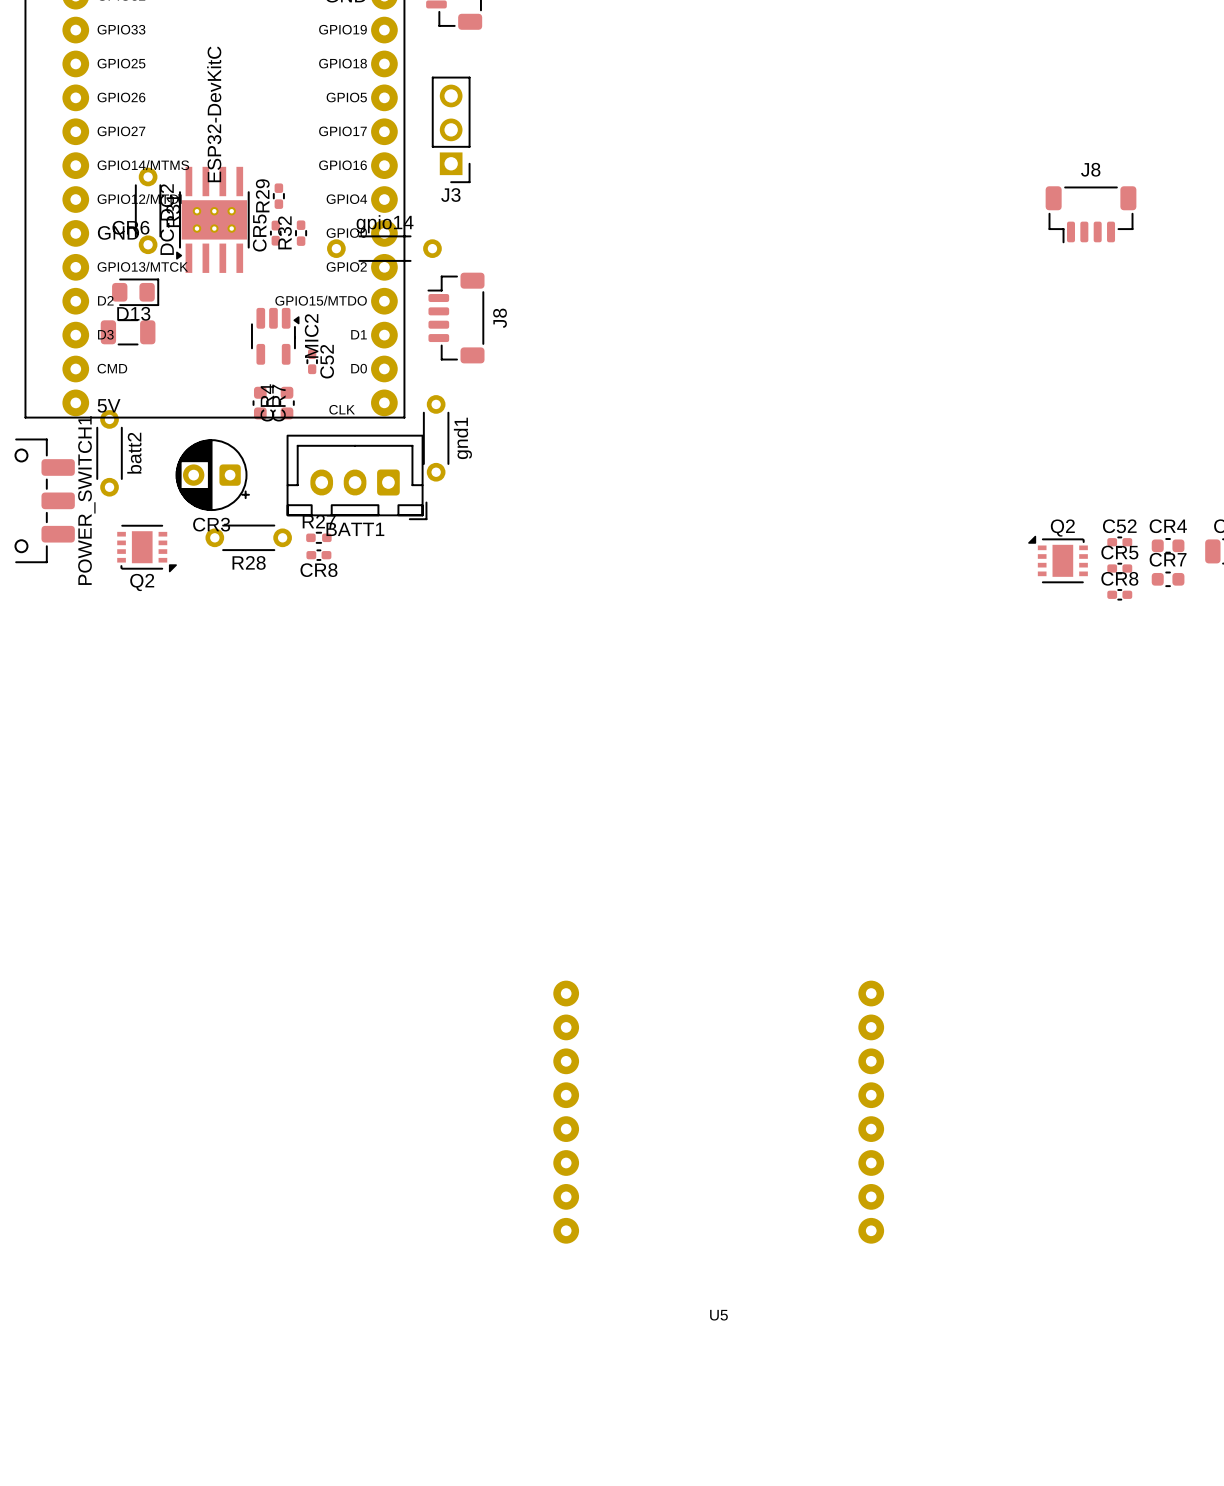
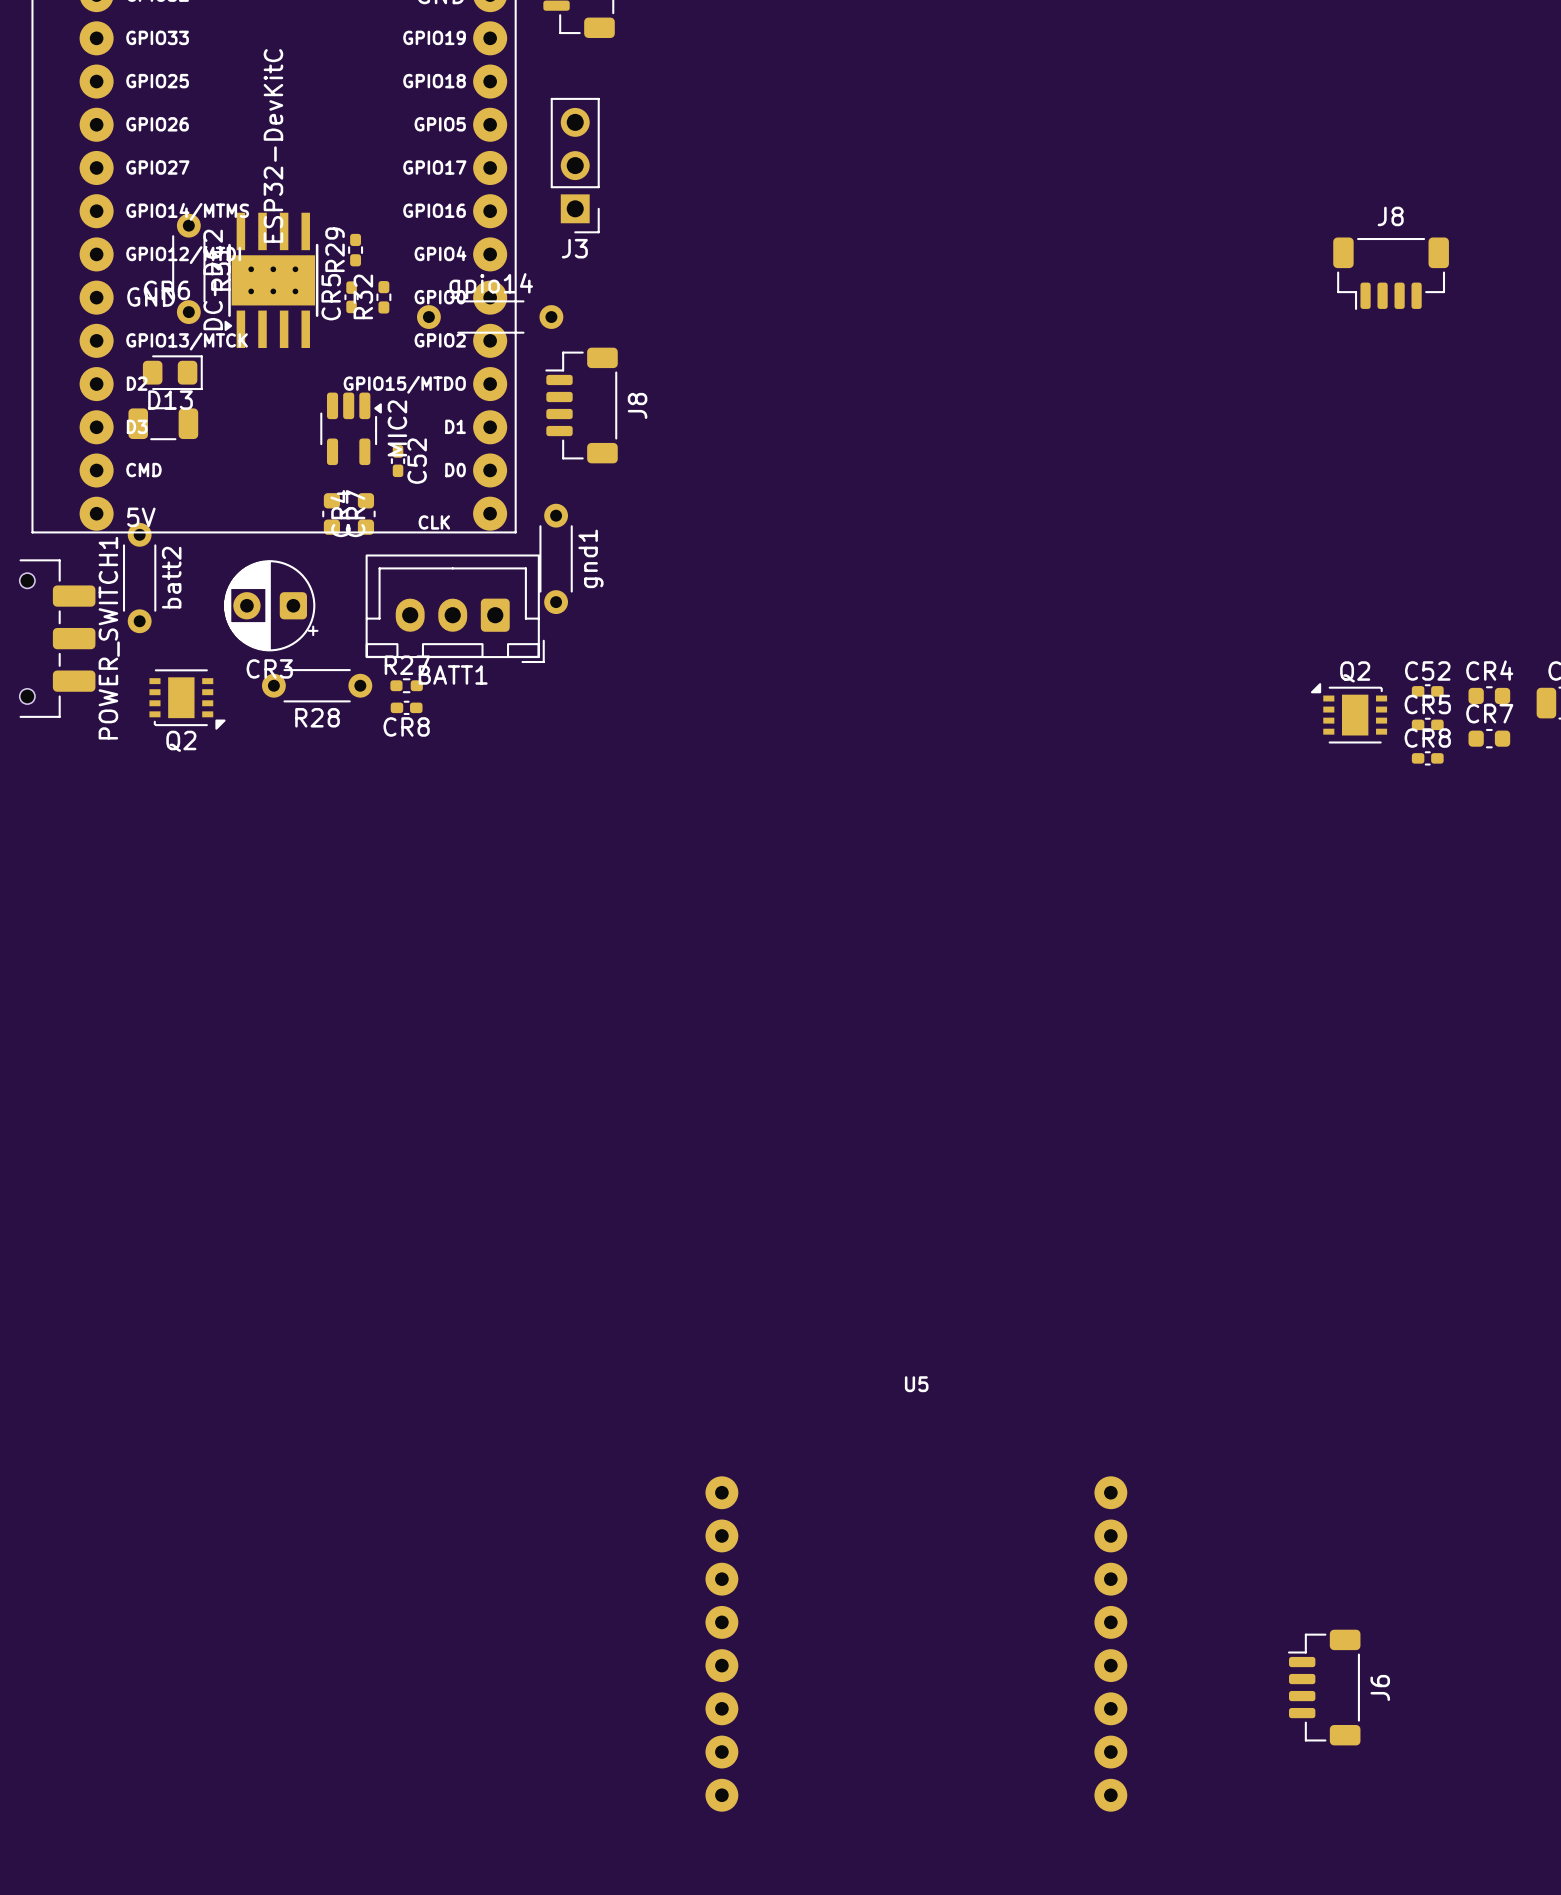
U5 position: (718, 1112) -> (916, 1643)
U5 name position: U5 (718, 1315) -> U5 (916, 1384)
J6: none -> (1324, 1687)

